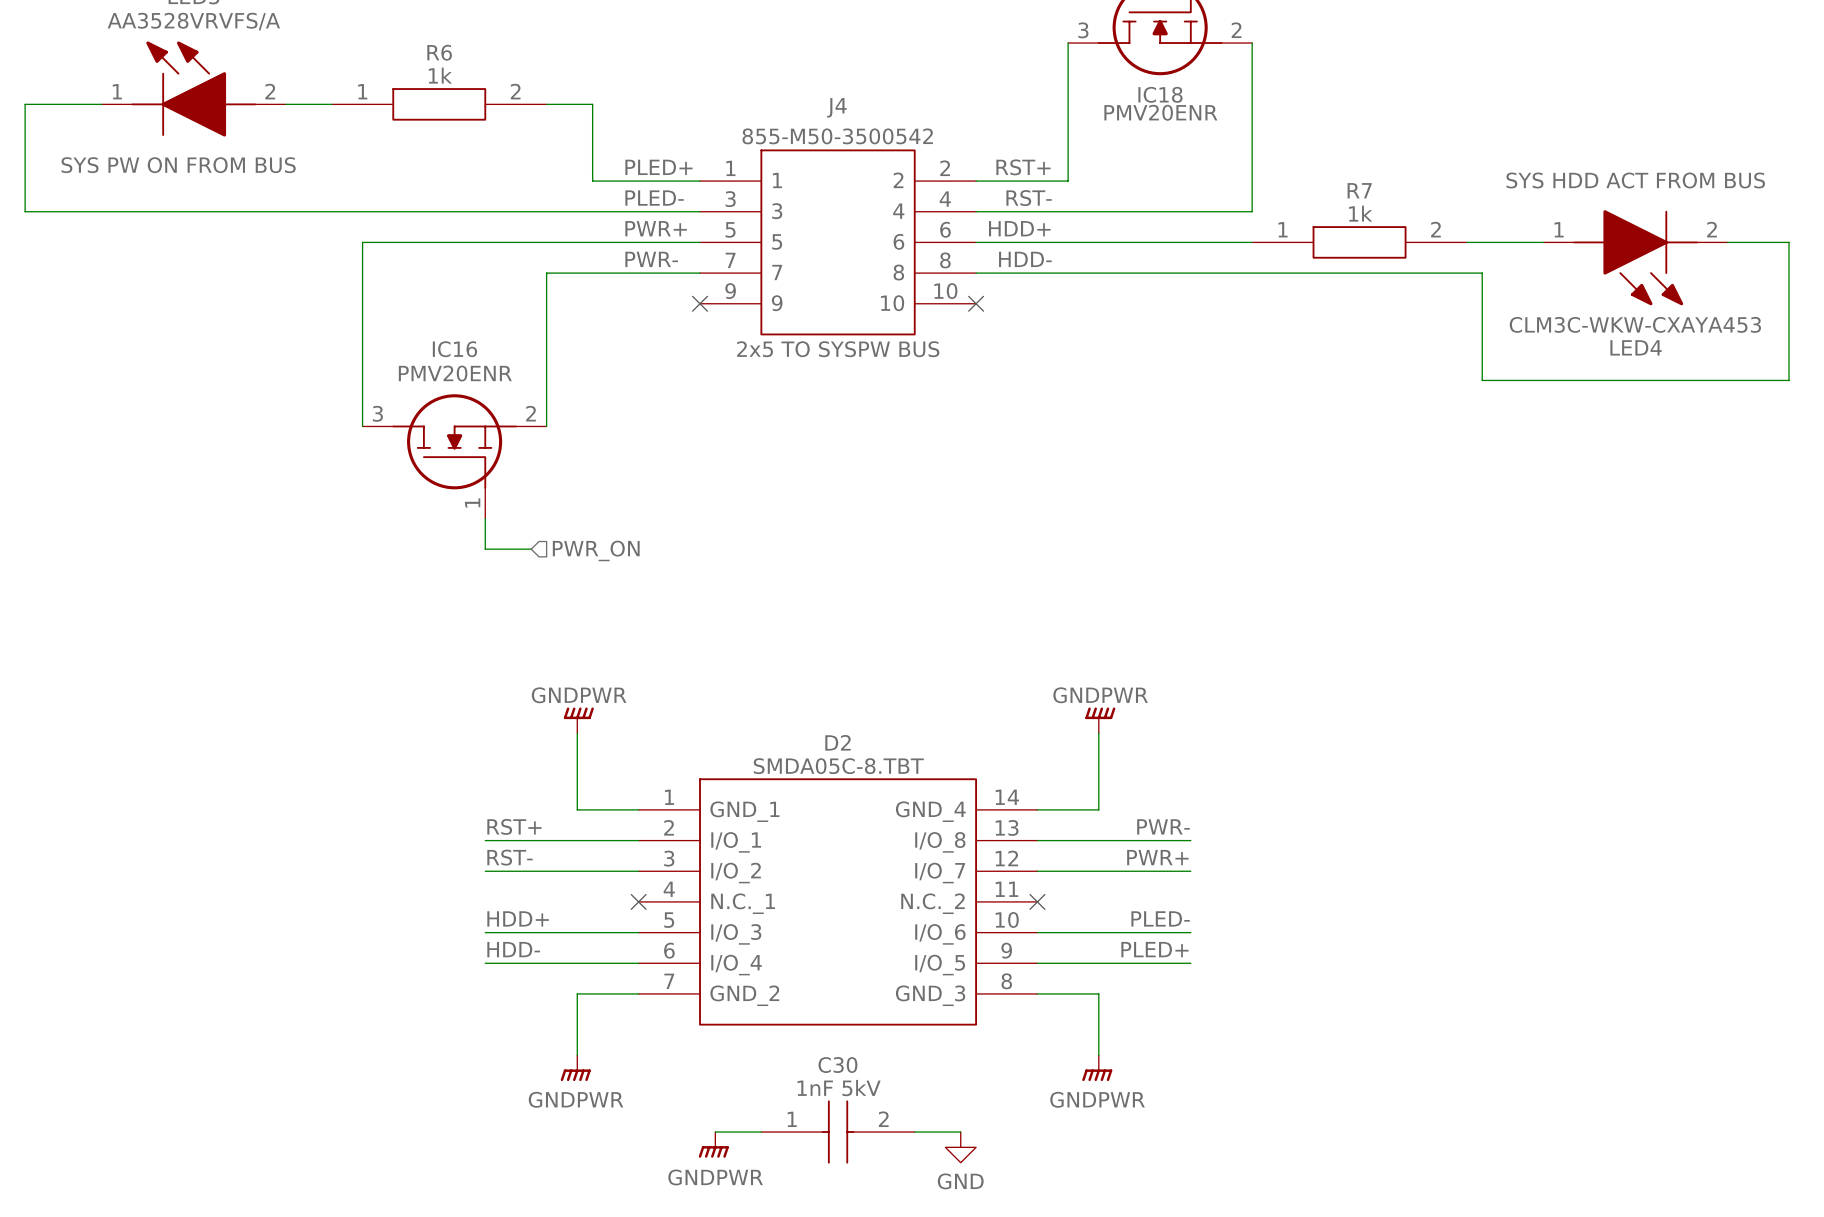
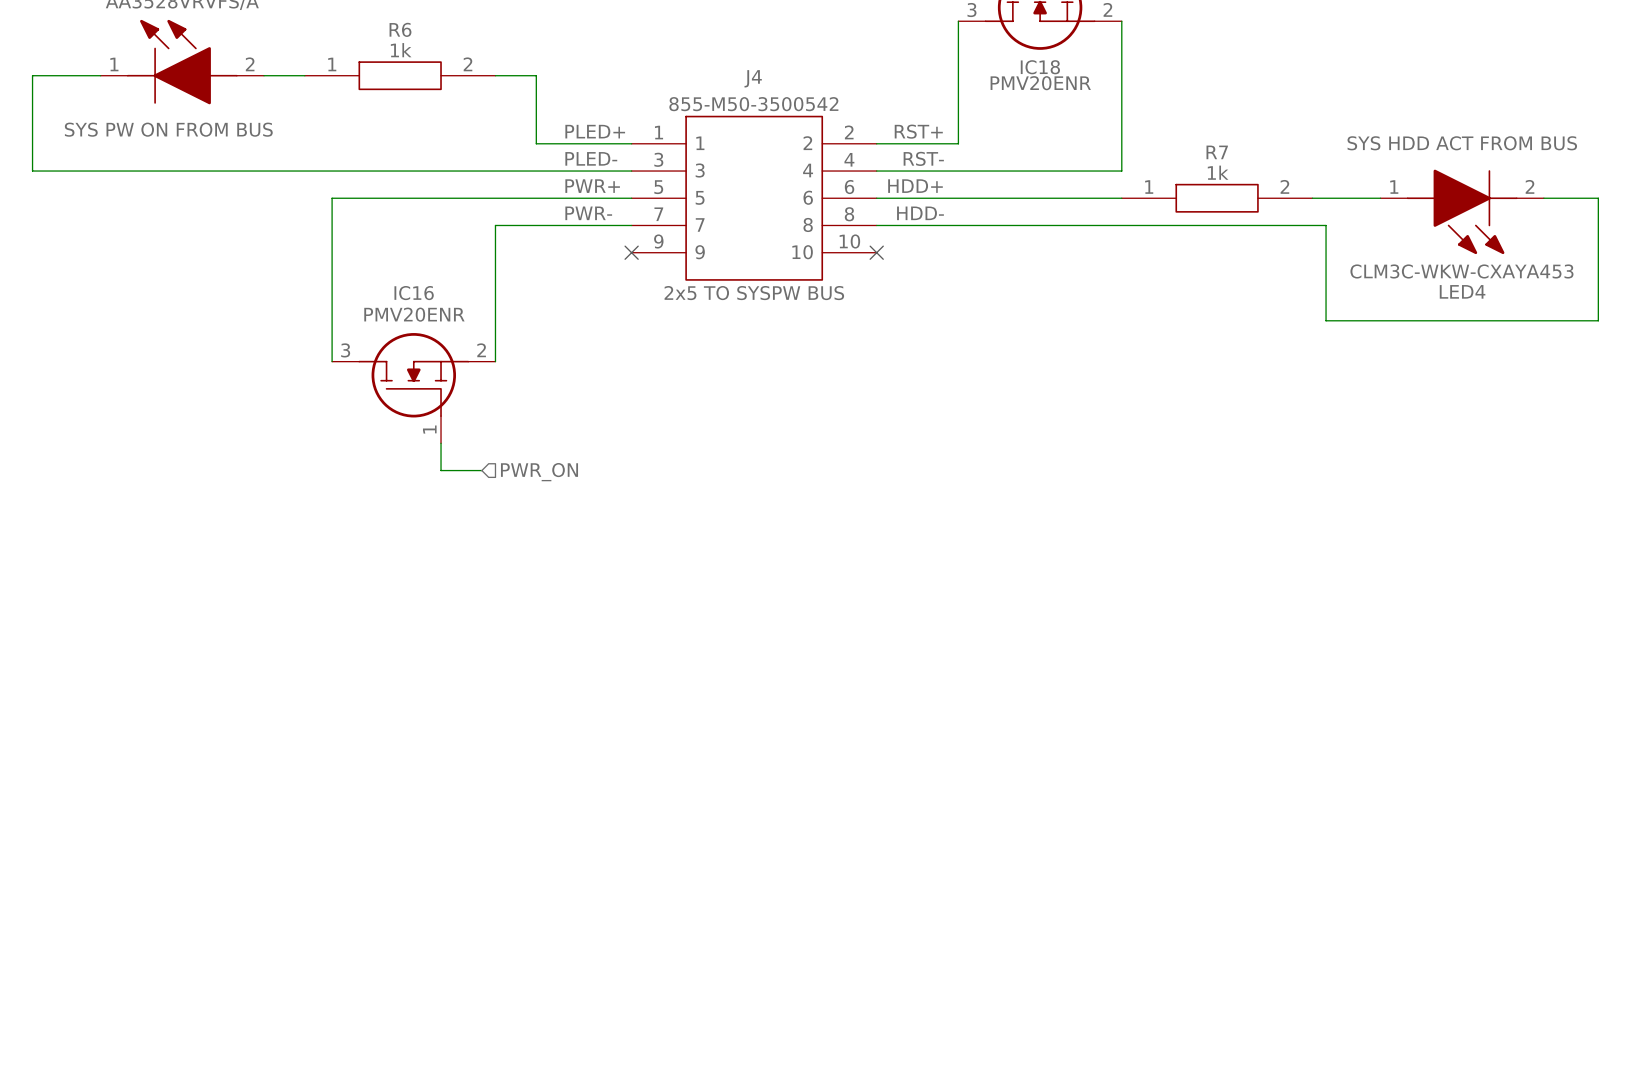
power symbol: GNDPWR (578, 720) -> none
power symbol: GNDPWR (1100, 720) -> none
wire: (577, 733) (577, 809) (638, 809) -> none
wire: (1098, 733) (1098, 809) (1037, 809) -> none
label: RST+ (514, 826) -> none
label: PWR- (1163, 826) -> none
wire: (485, 840) (638, 840) -> none
wire: (1037, 840) (1190, 840) -> none
label: RST- (510, 857) -> none
label: PWR+ (1157, 857) -> none
wire: (485, 871) (638, 871) -> none
wire: (1037, 871) (1190, 871) -> none
no-connect mark: (638, 901) -> none
D2: SMDA05C-8.TBT (838, 901) -> none
no-connect mark: (1037, 901) -> none
label: HDD+ (518, 918) -> none
label: PLED- (1160, 918) -> none
wire: (485, 932) (638, 932) -> none
wire: (1037, 932) (1190, 932) -> none
label: HDD- (513, 949) -> none
label: PLED+ (1154, 949) -> none
wire: (485, 963) (638, 963) -> none
wire: (1037, 963) (1190, 963) -> none
wire: (638, 993) (577, 993) (577, 1055) -> none
wire: (1037, 993) (1098, 993) (1098, 1055) -> none
power symbol: GNDPWR (575, 1068) -> none
power symbol: GNDPWR (1097, 1068) -> none
wire: (715, 1132) (761, 1132) -> none
C30: 1nF 5kV (838, 1132) -> none
wire: (914, 1132) (960, 1132) -> none
power symbol: GNDPWR (713, 1144) -> none
power symbol: GND (960, 1147) -> none

